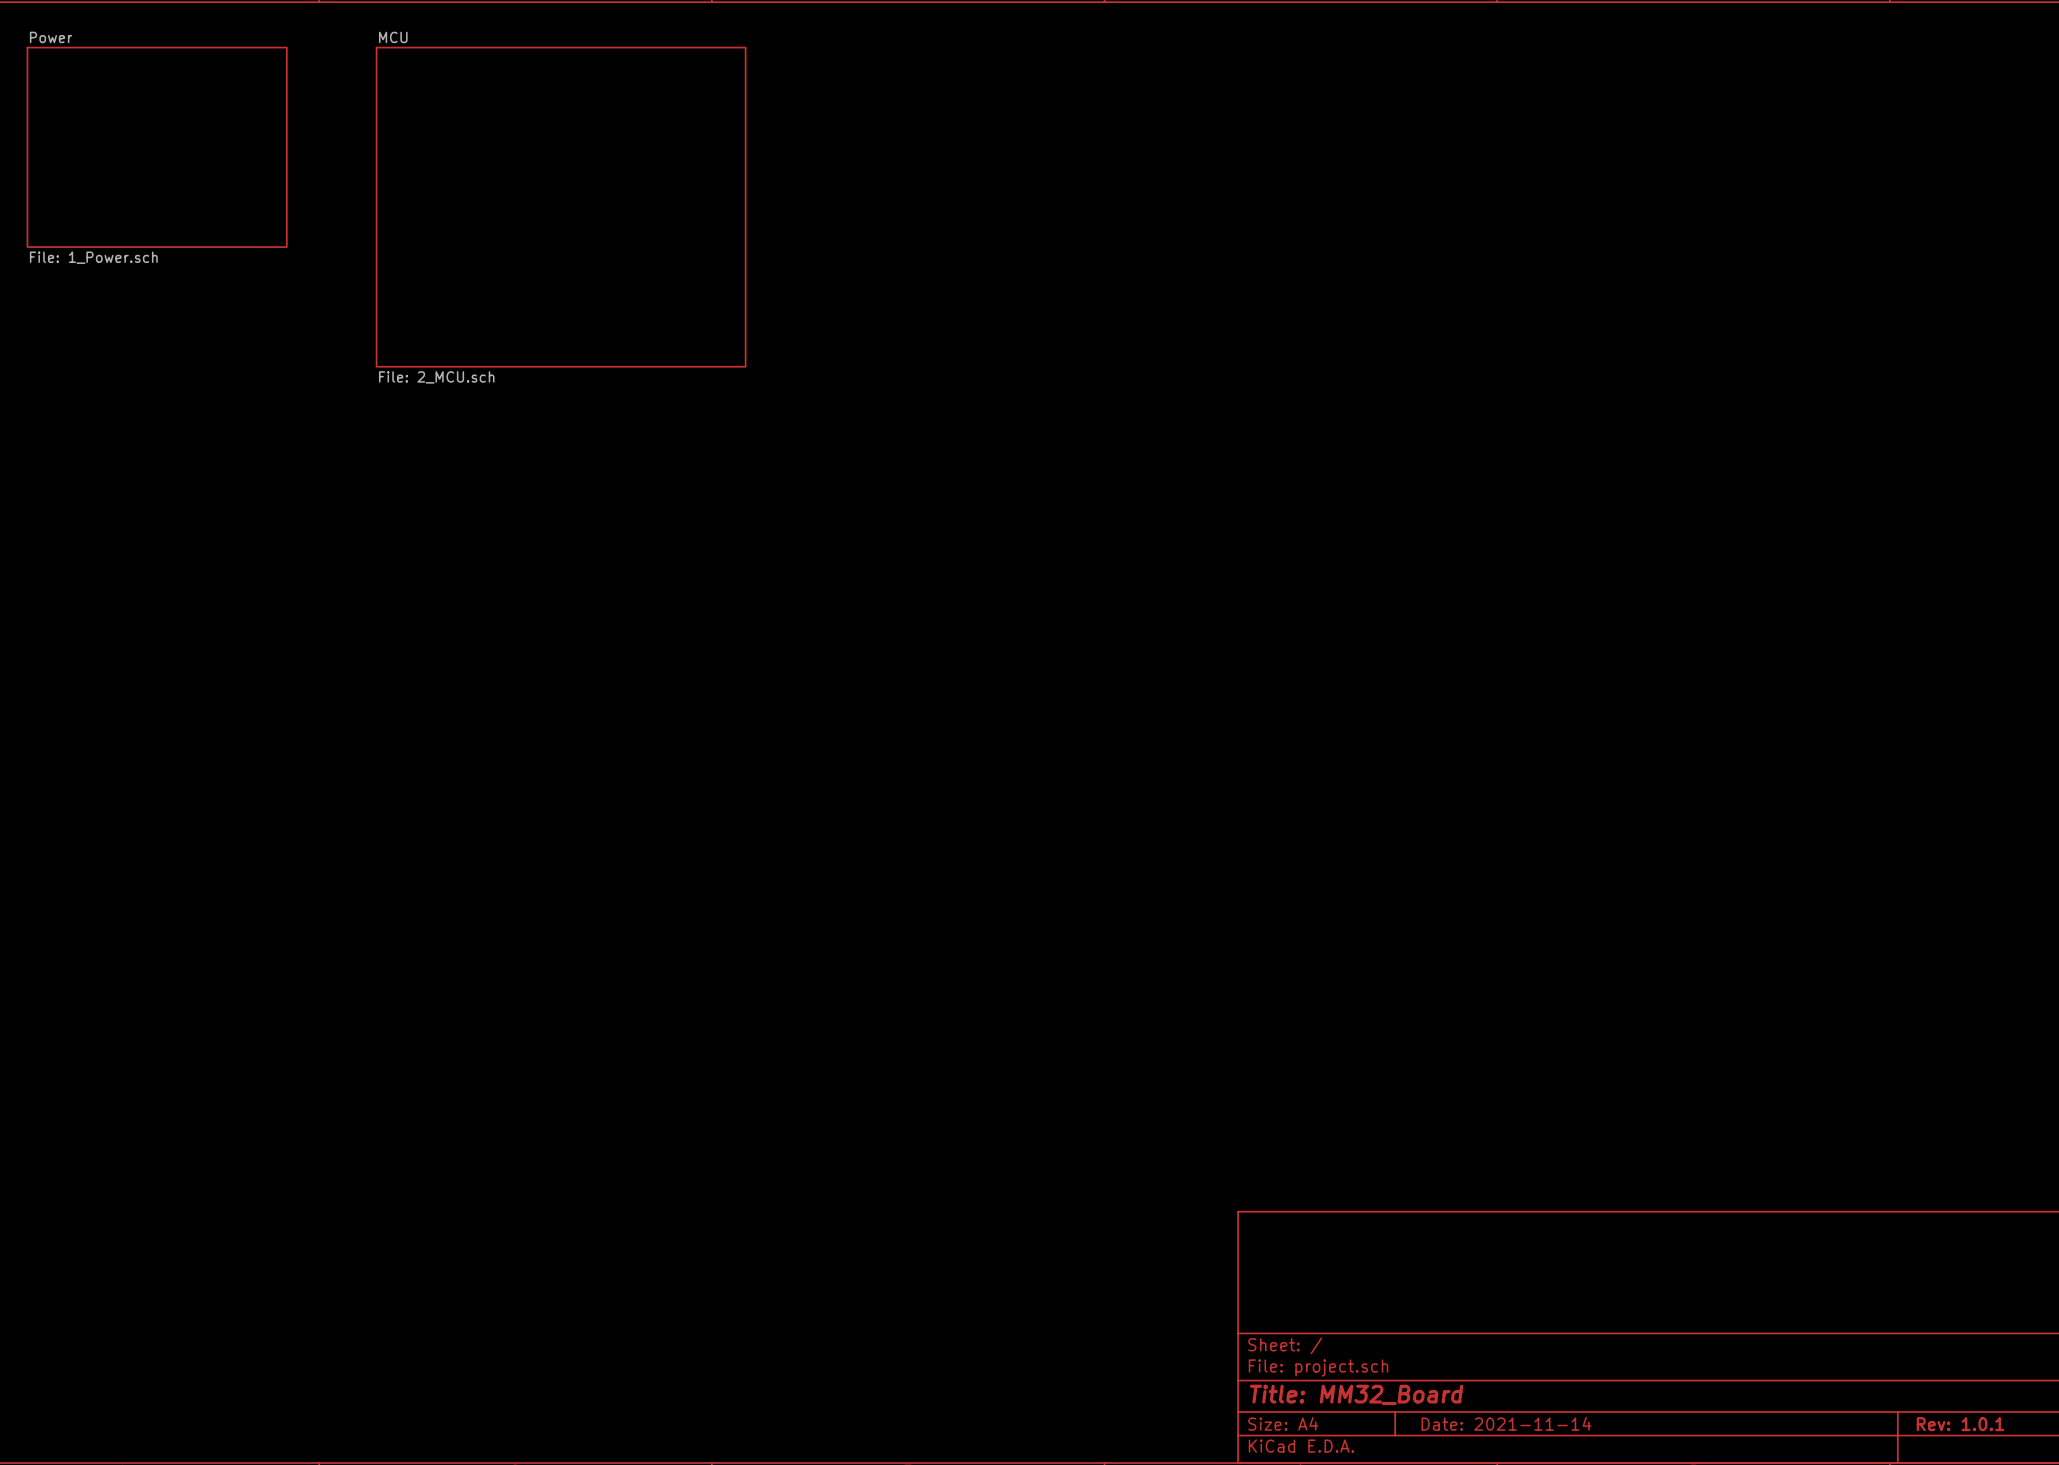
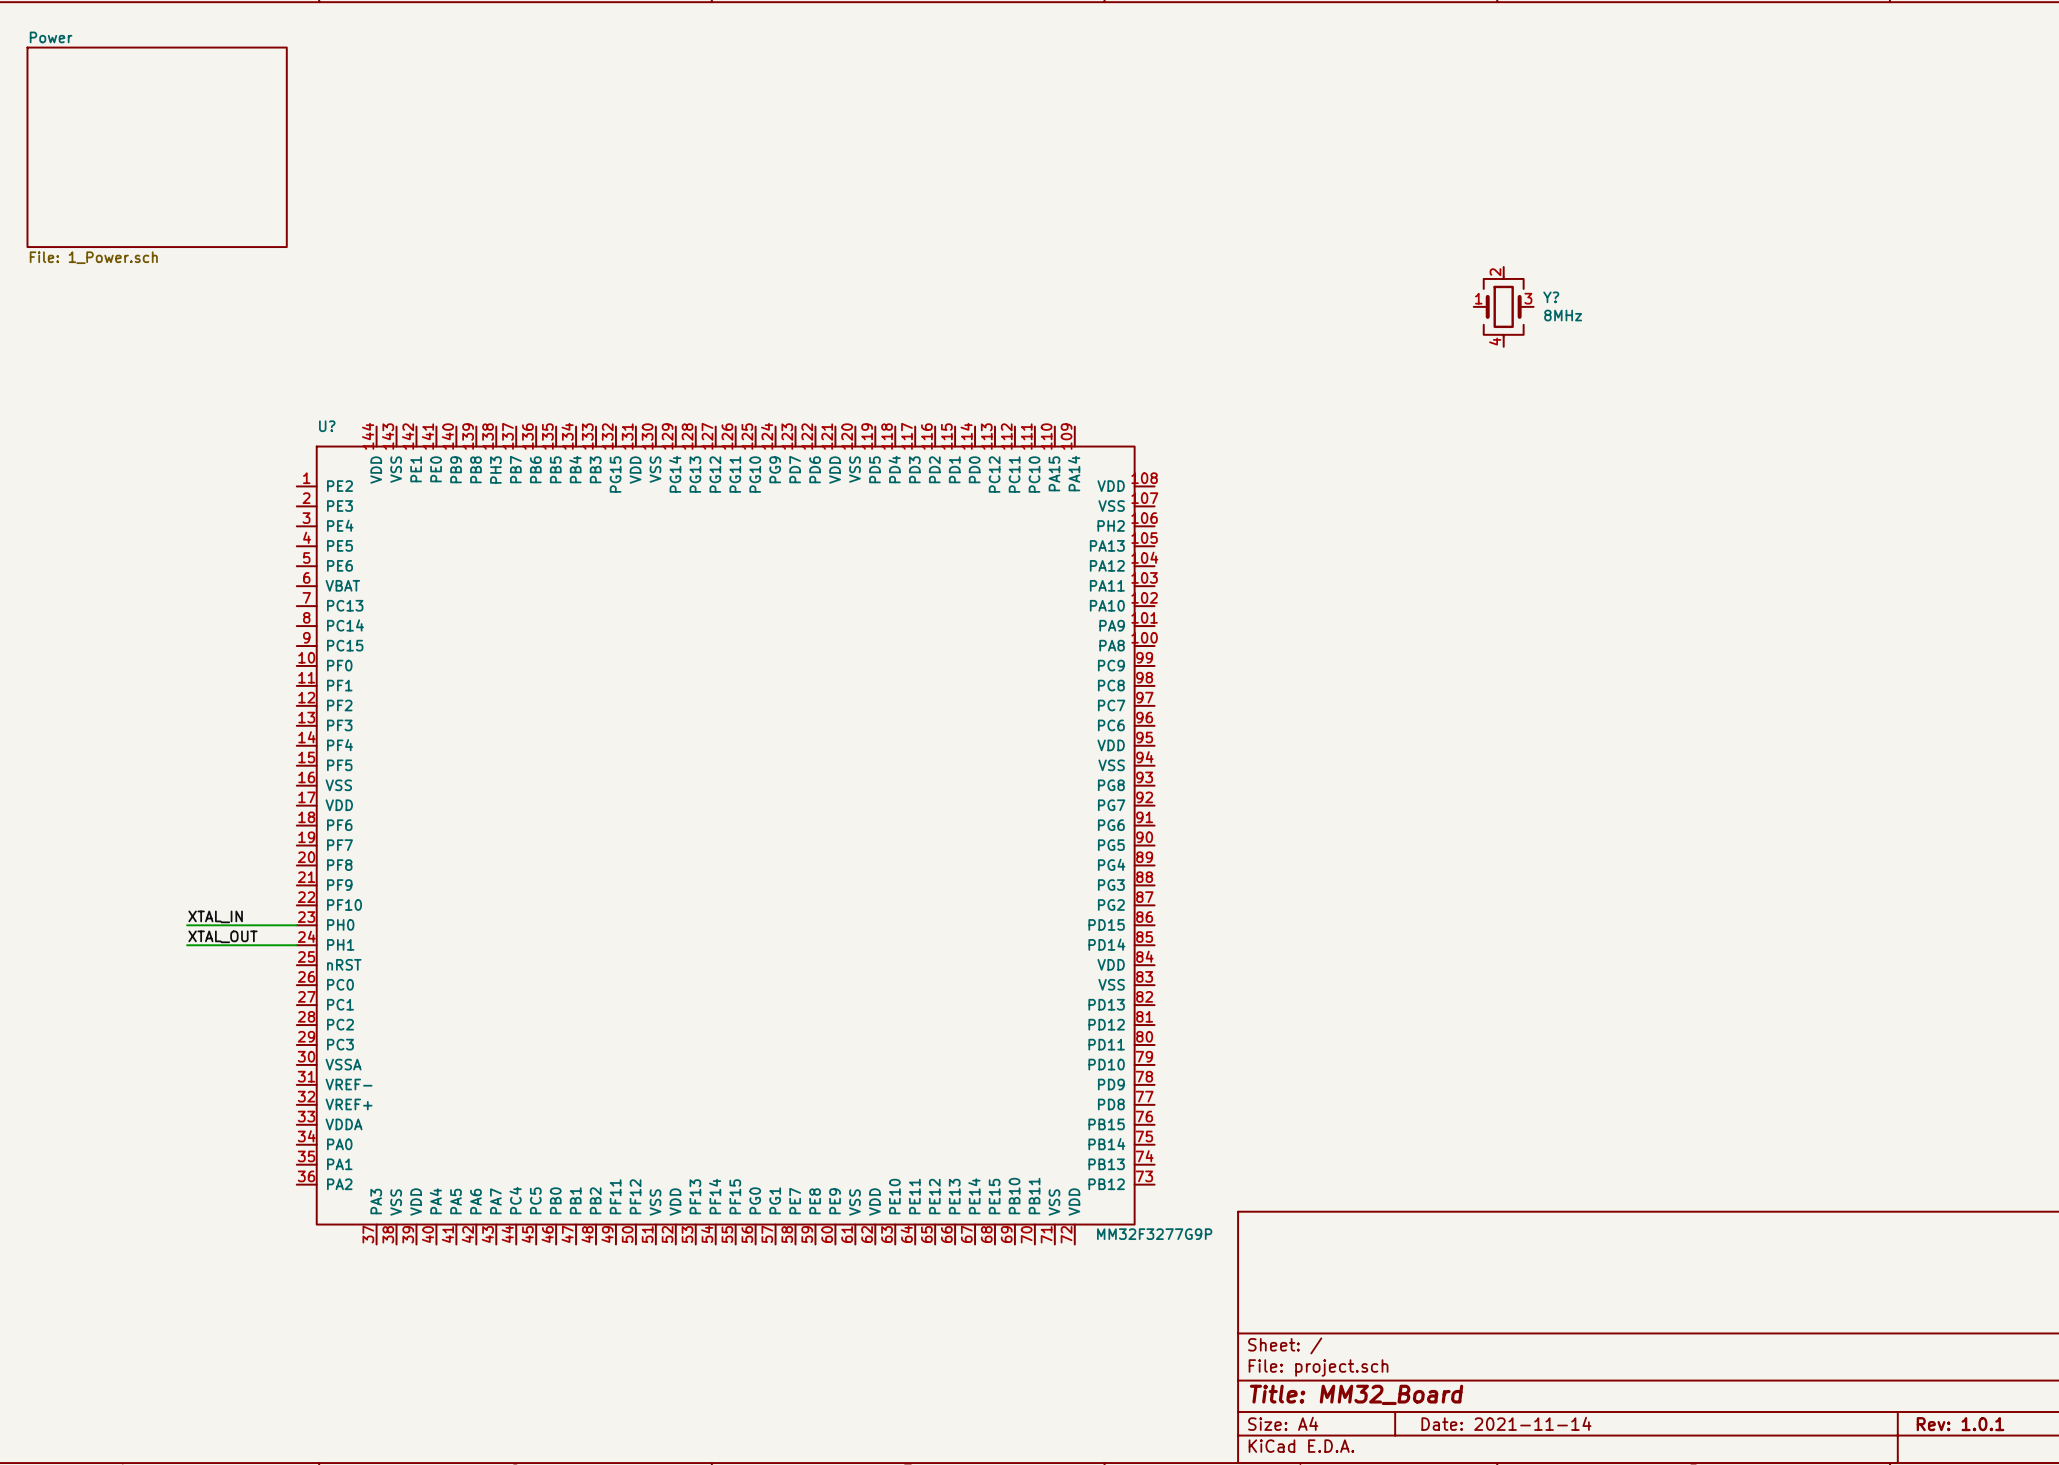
sheet MCU: File: 2_MCU.sch (561, 207) -> none
Y?: none -> 8MHz (1503, 306)
U?: none -> MM32F3277G9P (725, 835)
label: none -> XTAL_IN (215, 916)
wire: none -> (187, 925) (296, 925)
label: none -> XTAL_OUT (223, 936)
wire: none -> (187, 945) (296, 945)

